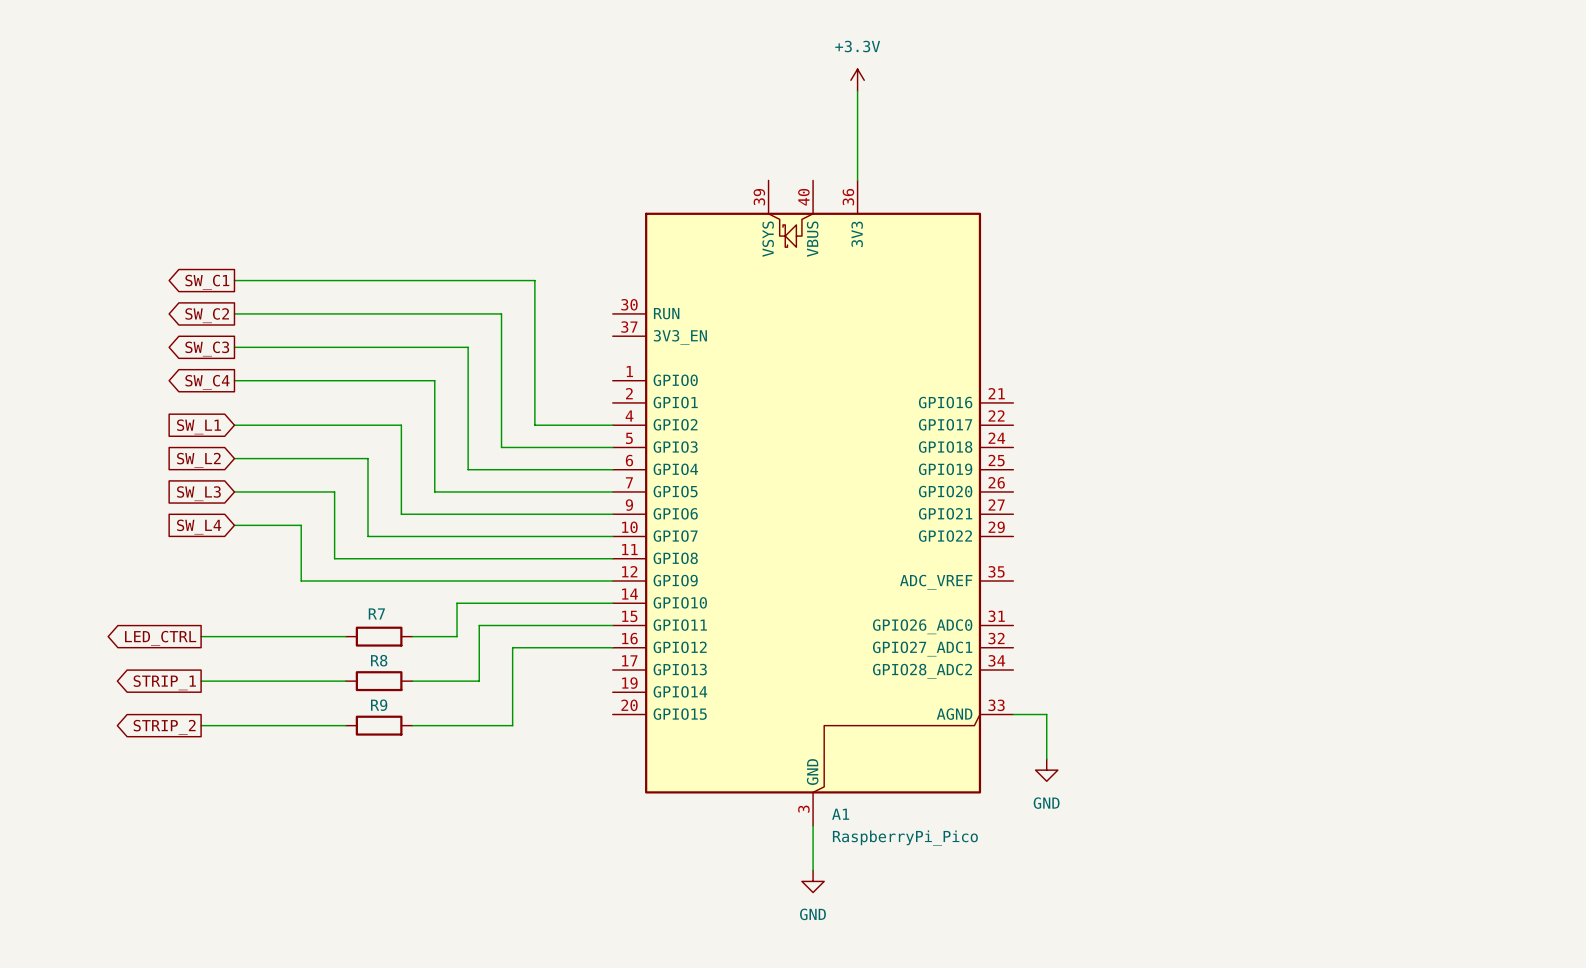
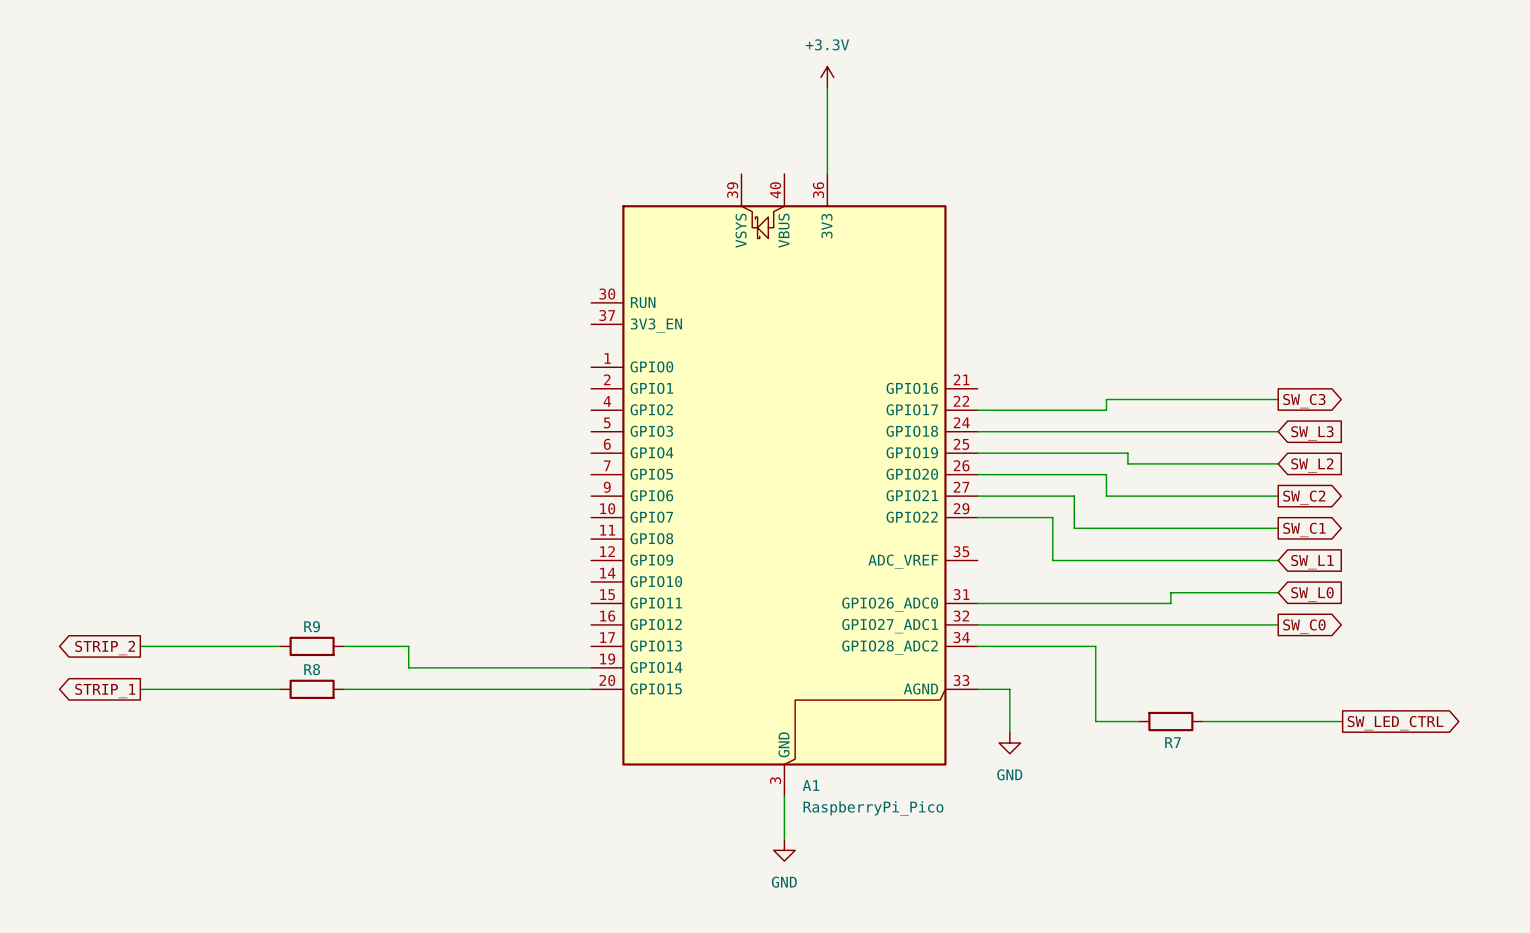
wire: (234, 280) (534, 280) (534, 425) (612, 425) -> none
global label: SW_C1 (207, 282) -> none
wire: (234, 313) (501, 313) (501, 447) (612, 447) -> none
global label: SW_C2 (207, 315) -> none
wire: (234, 347) (468, 347) (468, 469) (612, 469) -> none
global label: SW_C3 (207, 349) -> none
wire: (234, 380) (434, 380) (434, 491) (612, 491) -> none
global label: SW_C4 (207, 382) -> none
wire: none -> (1278, 399) (1106, 399) (1106, 410) (977, 410)
global label: none -> SW_C3 (1304, 401)
wire: (234, 425) (401, 425) (401, 514) (612, 514) -> none
global label: SW_L1 (198, 426) -> none
wire: none -> (977, 431) (1278, 431)
global label: none -> SW_L3 (1312, 433)
wire: (234, 458) (367, 458) (367, 536) (612, 536) -> none
global label: SW_L2 (198, 460) -> none
wire: none -> (977, 453) (1127, 453) (1127, 463) (1278, 463)
global label: none -> SW_L2 (1312, 465)
wire: (234, 491) (334, 491) (334, 558) (612, 558) -> none
wire: none -> (977, 474) (1106, 474) (1106, 496) (1278, 496)
global label: SW_L3 (198, 493) -> none
wire: none -> (977, 496) (1074, 496) (1074, 528) (1278, 528)
global label: none -> SW_C2 (1304, 497)
wire: (234, 525) (301, 525) (301, 580) (612, 580) -> none
global label: SW_L4 (199, 527) -> none
wire: none -> (977, 517) (1052, 517) (1052, 560) (1278, 560)
global label: none -> SW_C1 (1304, 529)
global label: none -> SW_L1 (1312, 562)
wire: (612, 603) (457, 603) (457, 636) (412, 636) -> none
R7 name position: R7 (376, 613) -> R7 (1172, 742)
wire: none -> (1278, 592) (1170, 592) (1170, 603) (977, 603)
global label: none -> SW_L0 (1312, 594)
wire: (612, 625) (479, 625) (479, 681) (412, 681) -> none
wire: (201, 636) (345, 636) -> none
R7 position: (379, 636) -> (1170, 721)
global label: LED_CTRL (160, 638) -> none
wire: (612, 647) (512, 647) (512, 725) (412, 725) -> none
wire: none -> (977, 624) (1278, 624)
global label: none -> SW_C0 (1304, 626)
wire: none -> (344, 646) (408, 646) (408, 667) (591, 667)
wire: none -> (977, 646) (1095, 646) (1095, 721) (1138, 721)
wire: (201, 681) (345, 681) -> (140, 646) (279, 646)
R8 position: (379, 681) -> (312, 689)
global label position: STRIP_1 (164, 682) -> STRIP_1 (105, 690)
wire: none -> (344, 689) (591, 689)
wire: (201, 725) (345, 725) -> (140, 689) (279, 689)
R9 position: (379, 725) -> (312, 646)
global label position: STRIP_2 (164, 727) -> STRIP_2 (105, 648)
wire: none -> (1203, 721) (1342, 721)
global label: none -> SW_LED_CTRL (1395, 723)

